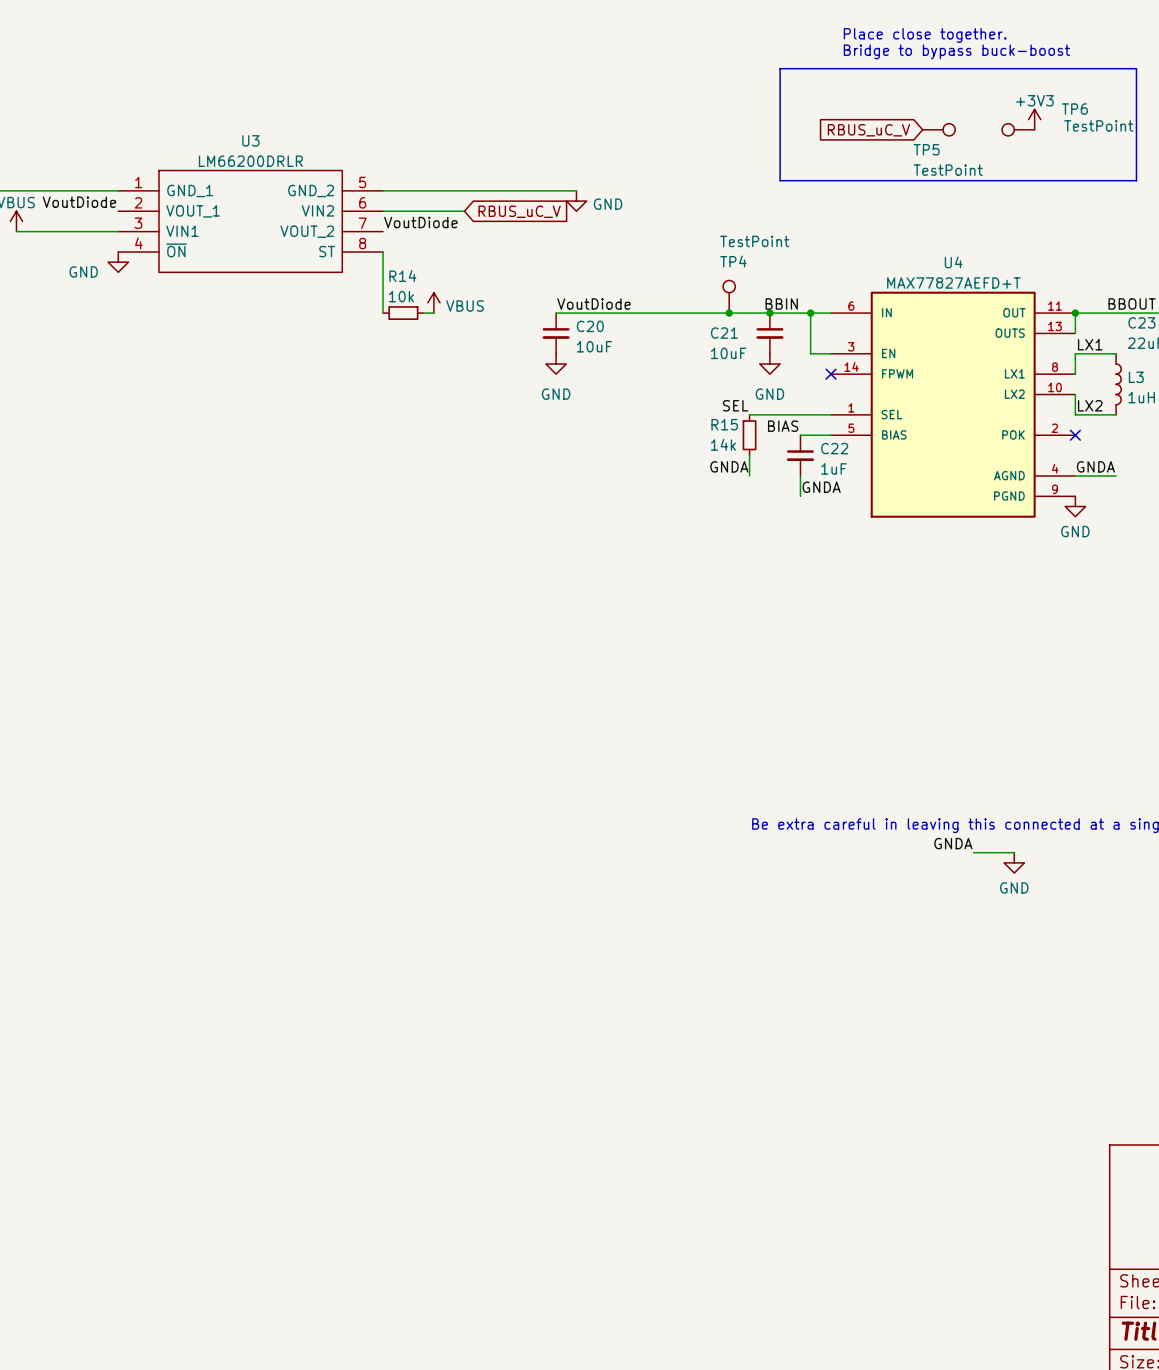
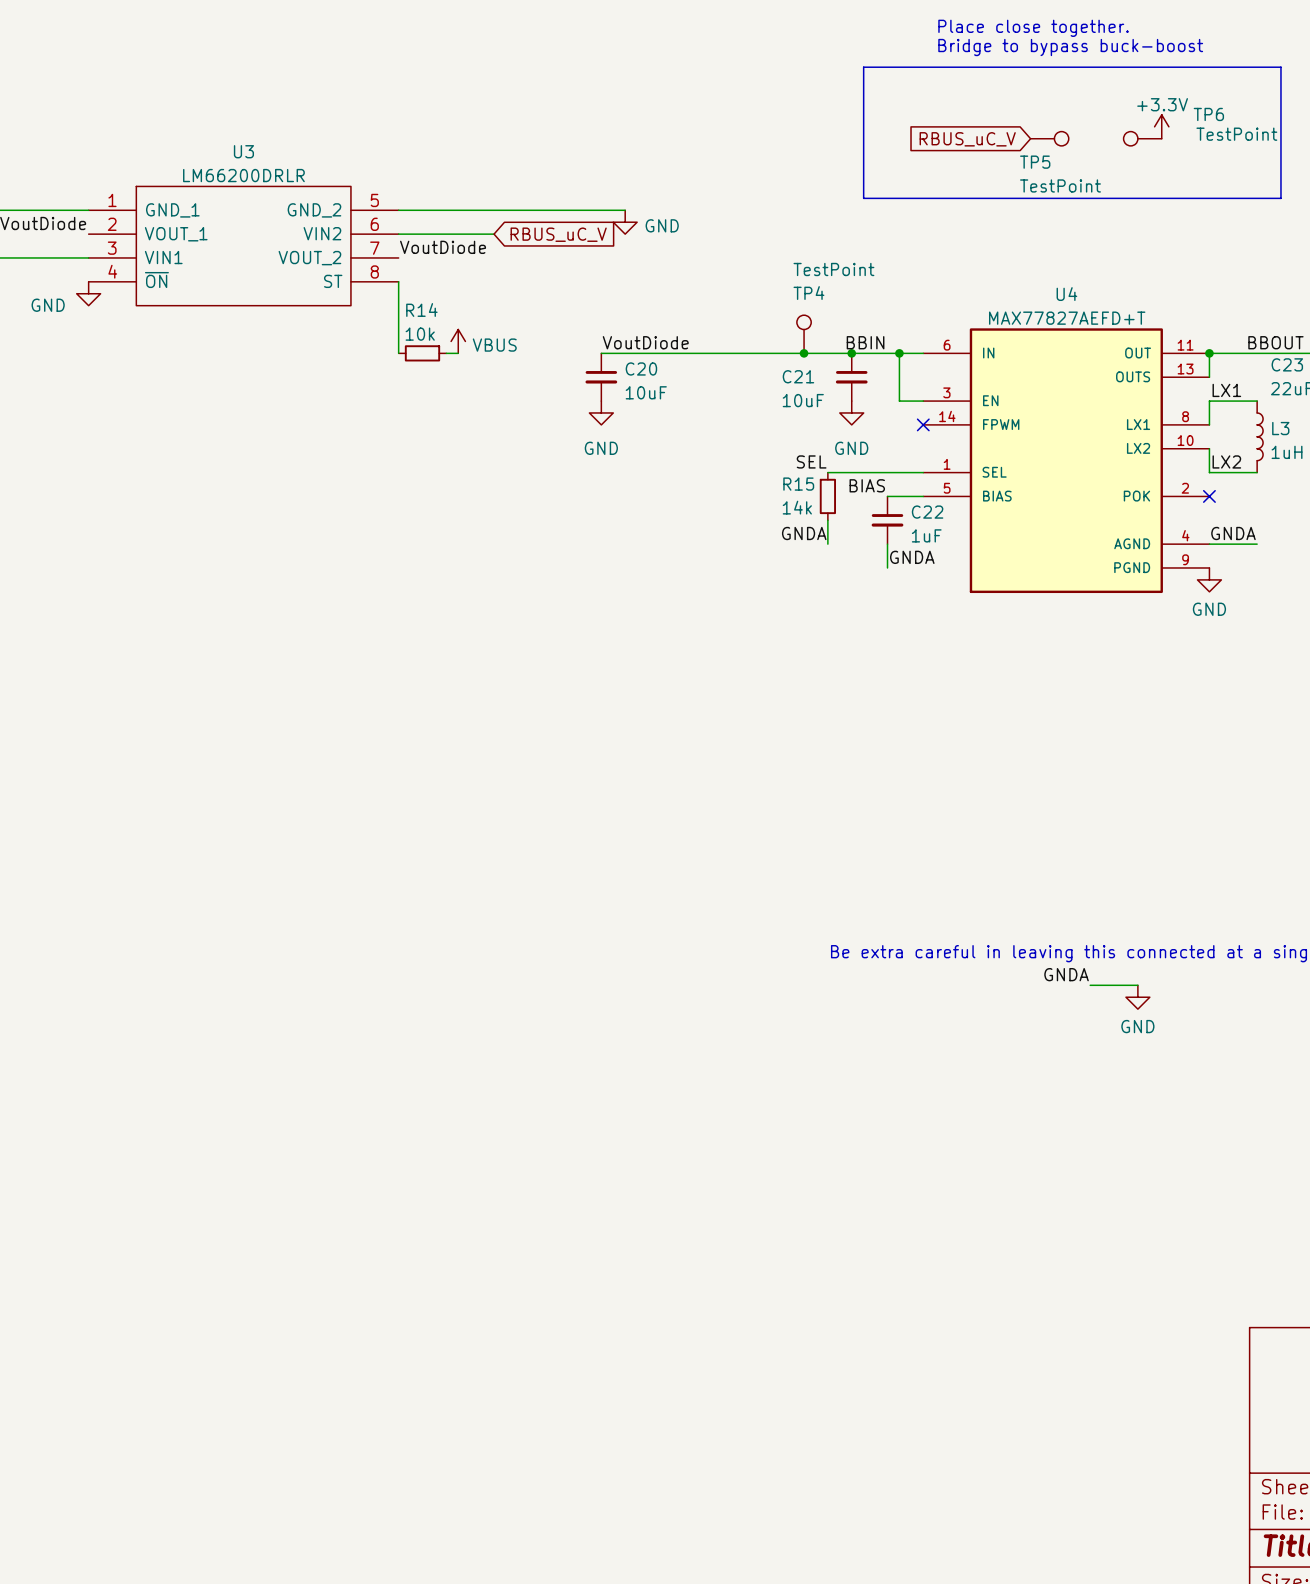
power symbol: +3V3 (1034, 119) -> +3.3V (1161, 126)

